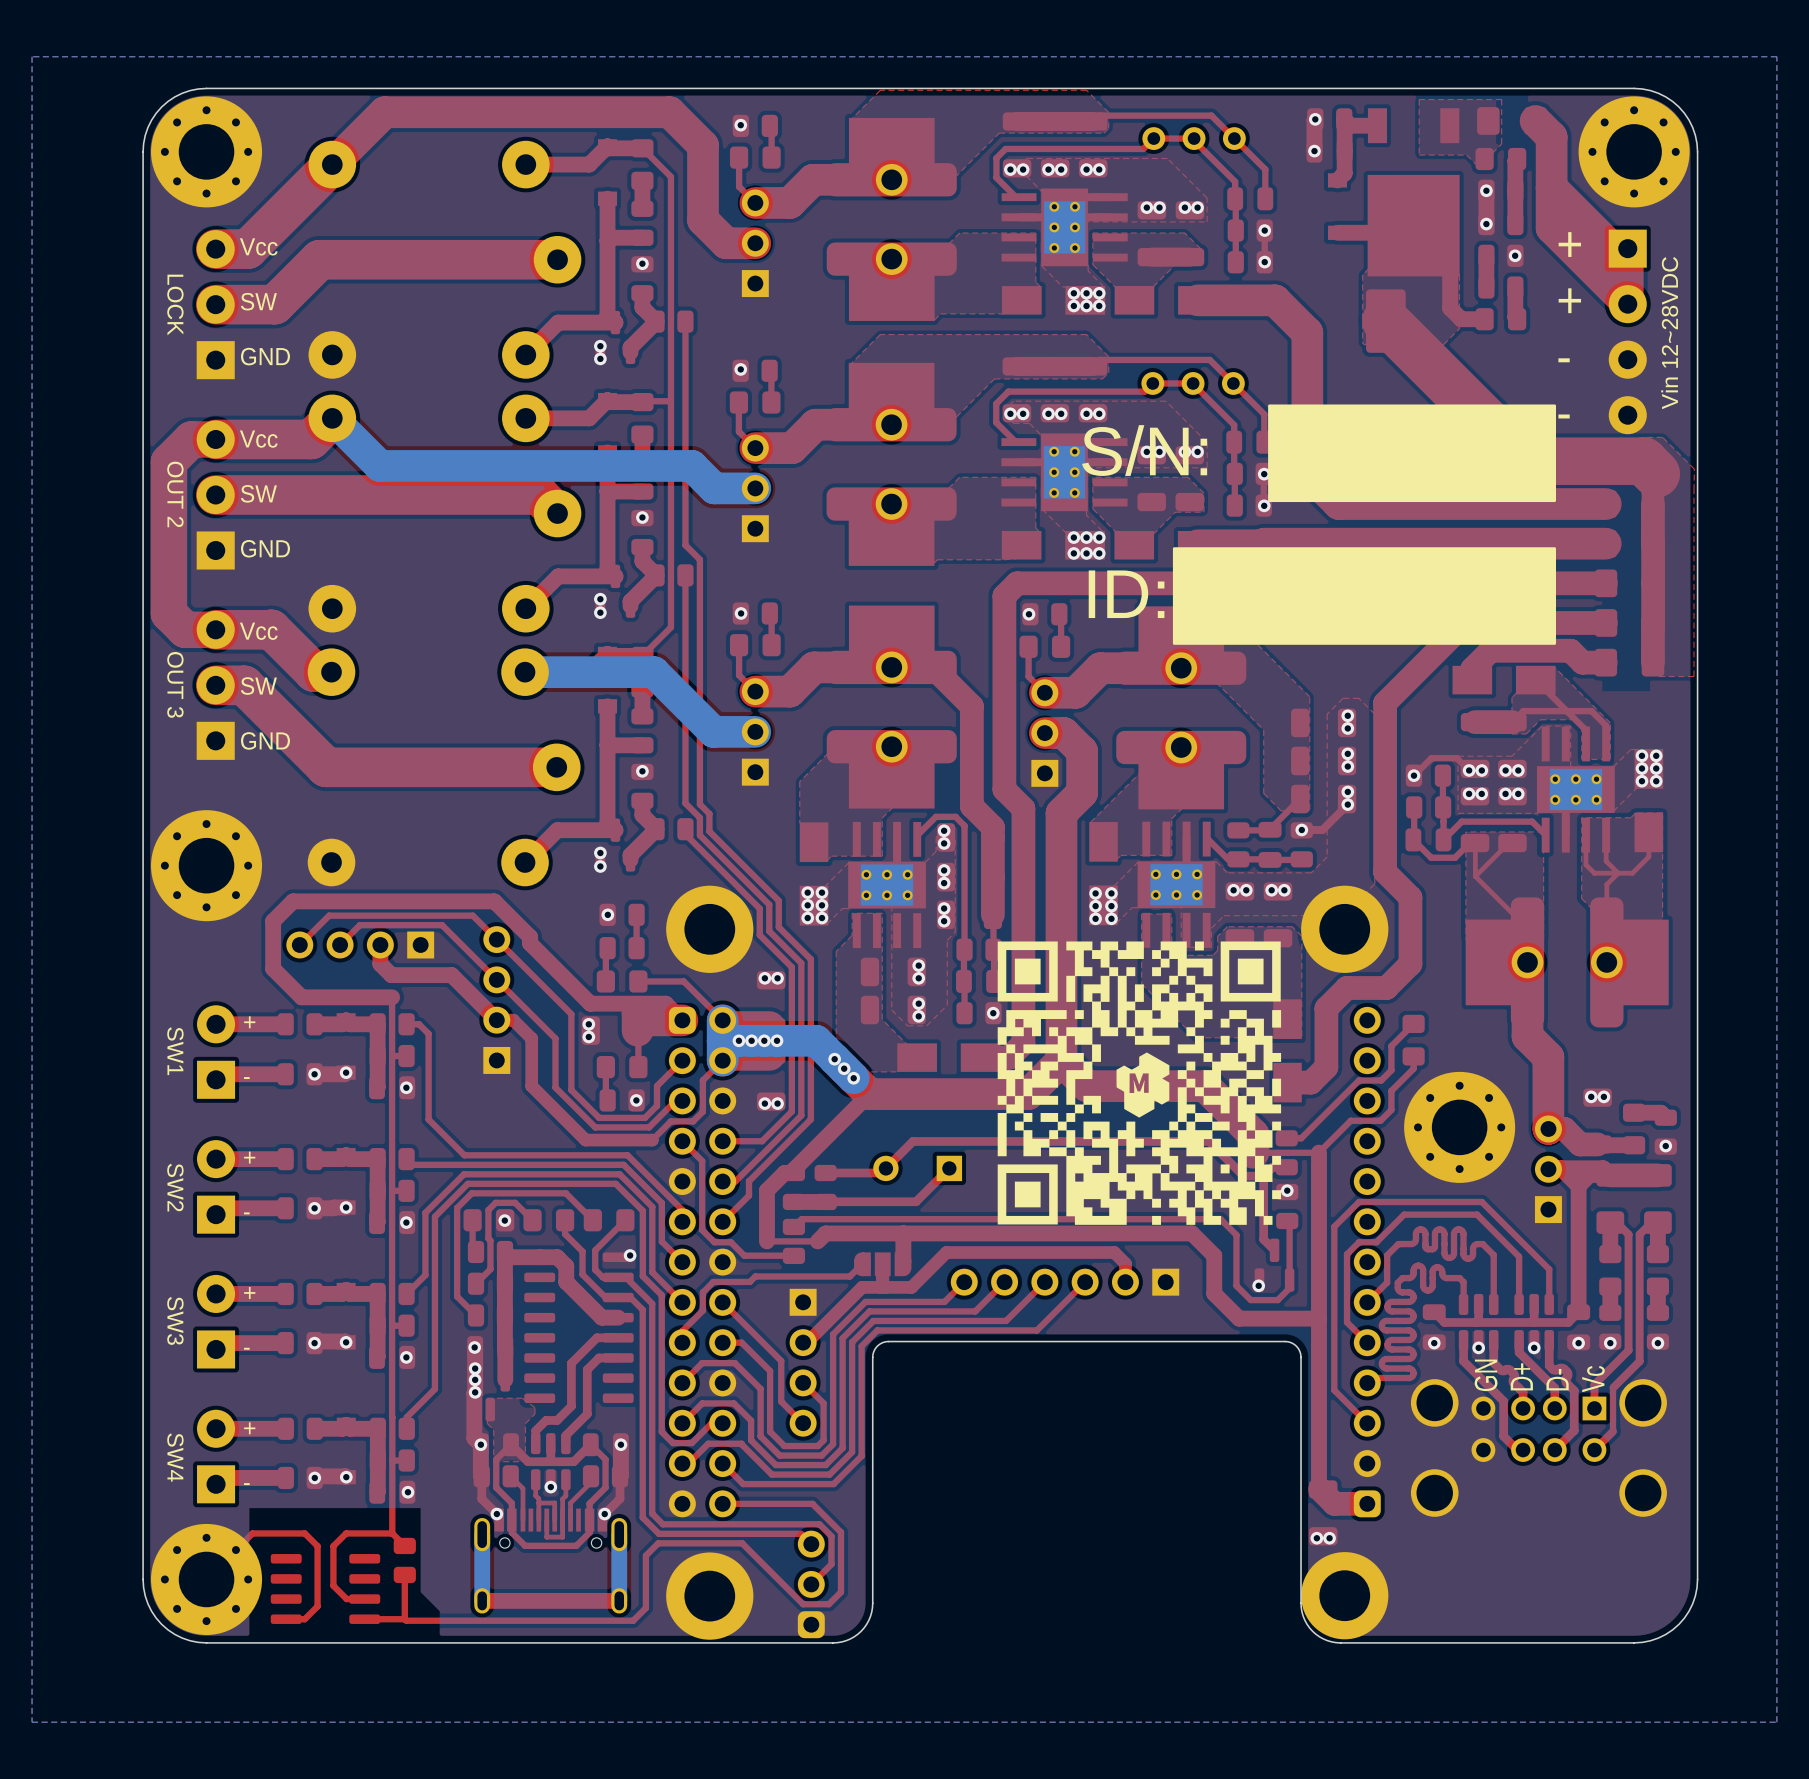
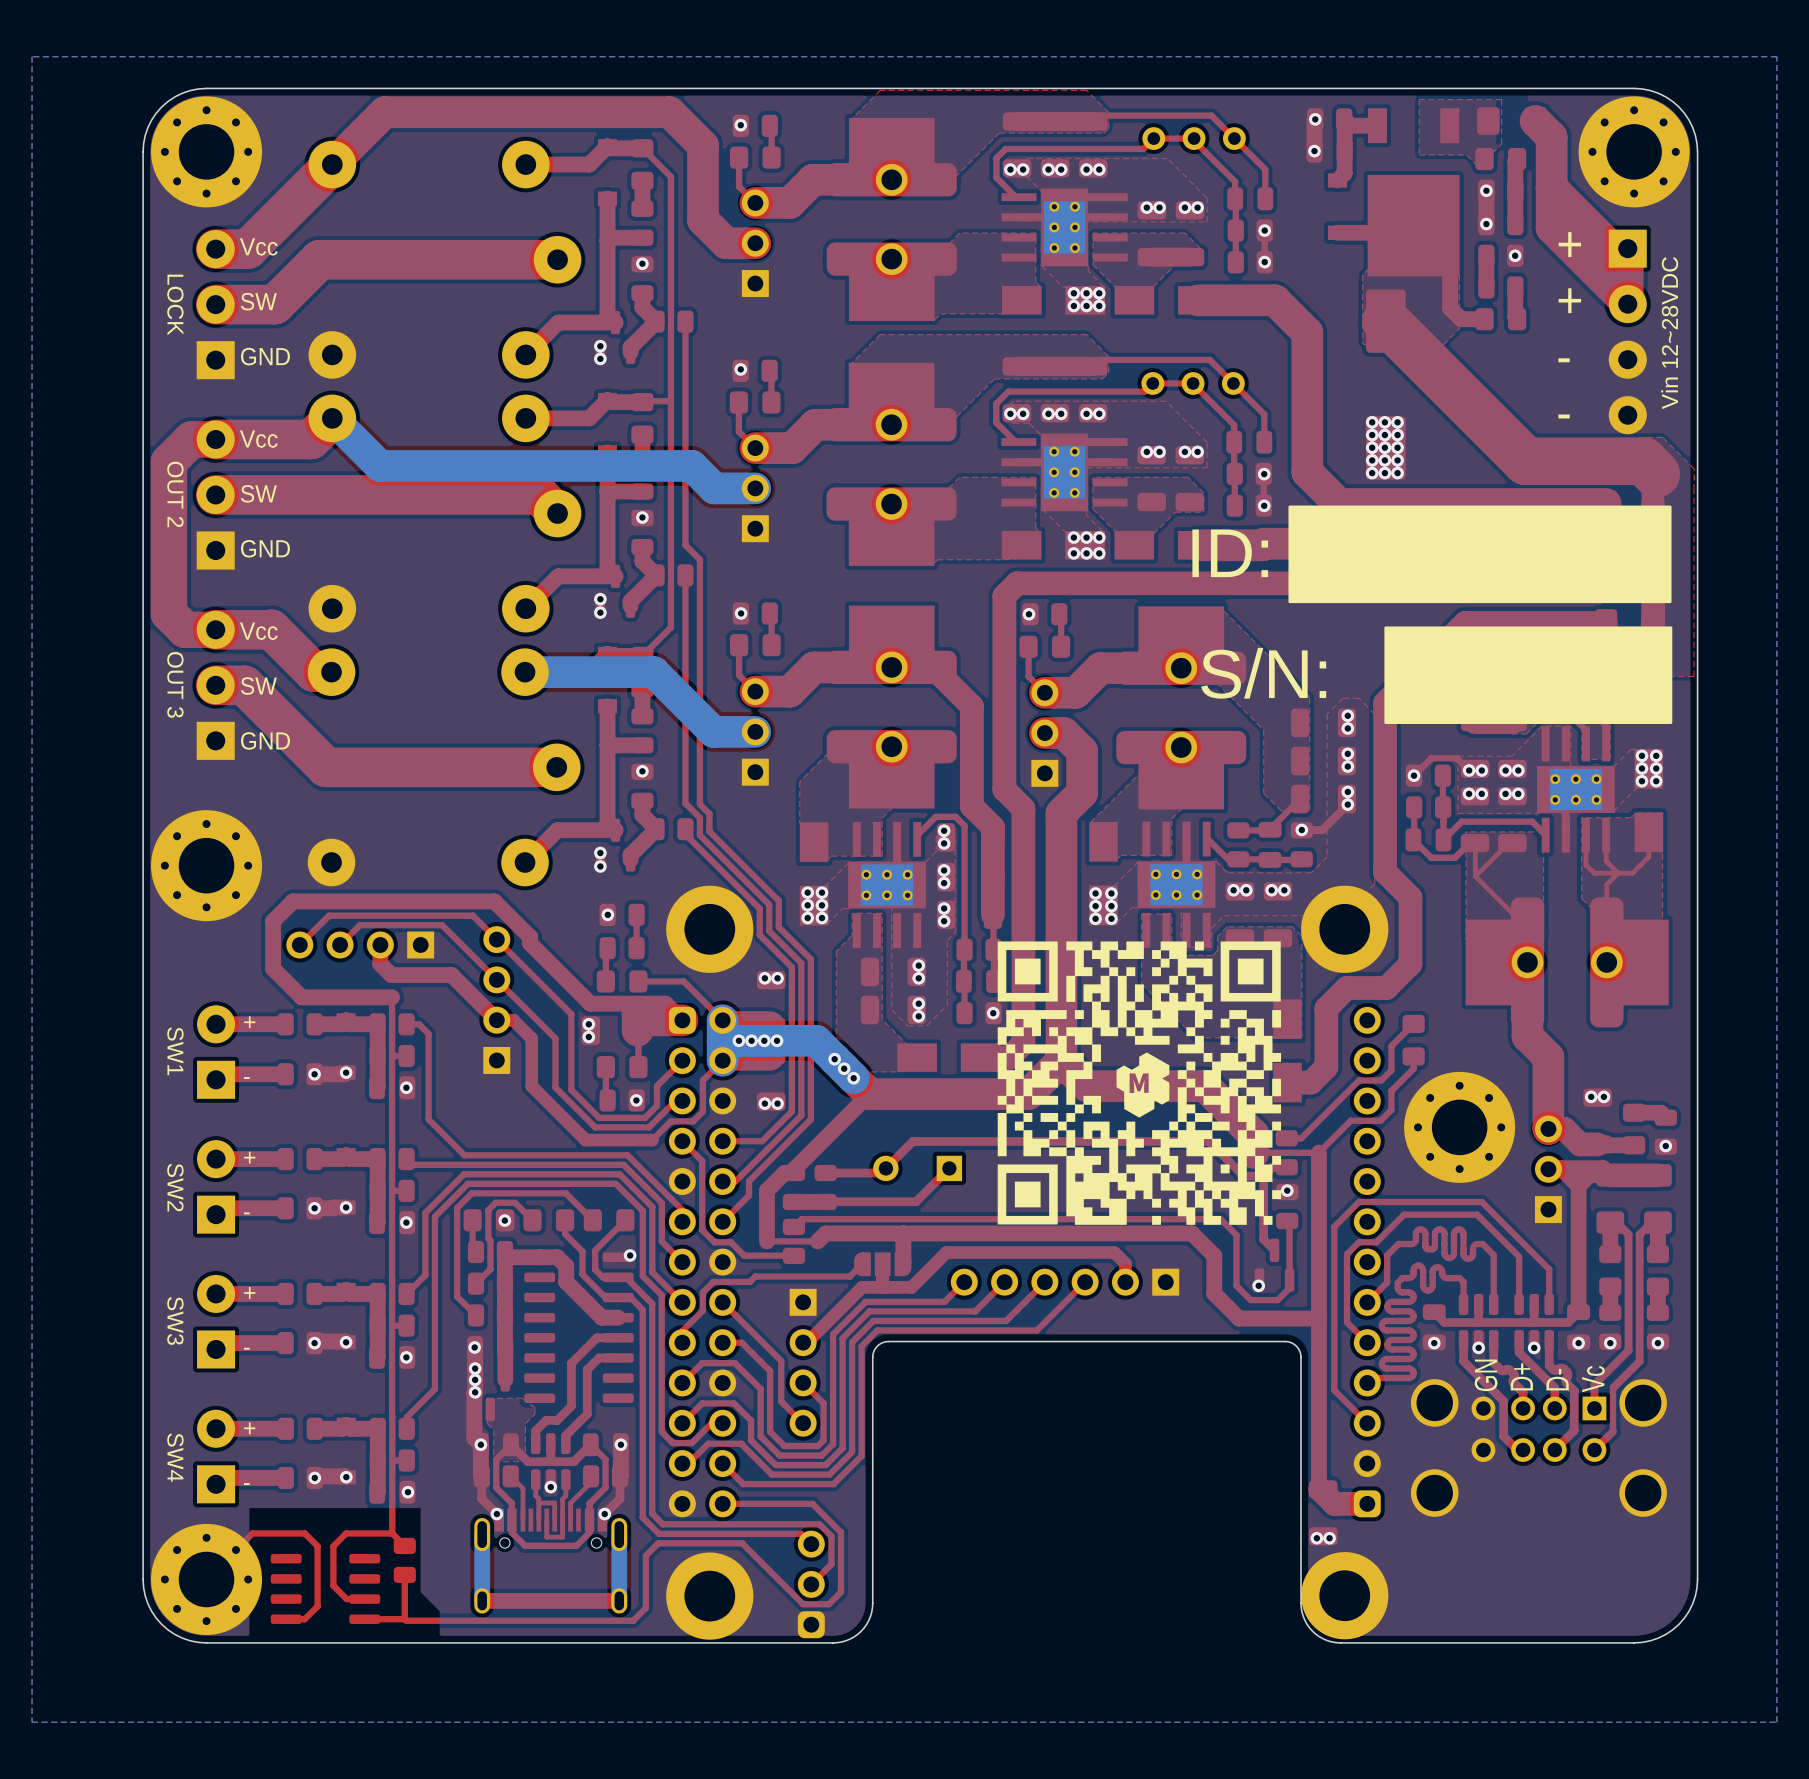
text position: S/N: (1144, 450) -> S/N: (1263, 673)
drawing position: (1412, 453) -> (1528, 675)
text position: ID: (1126, 594) -> ID: (1230, 553)
drawing position: (1364, 596) -> (1479, 554)

